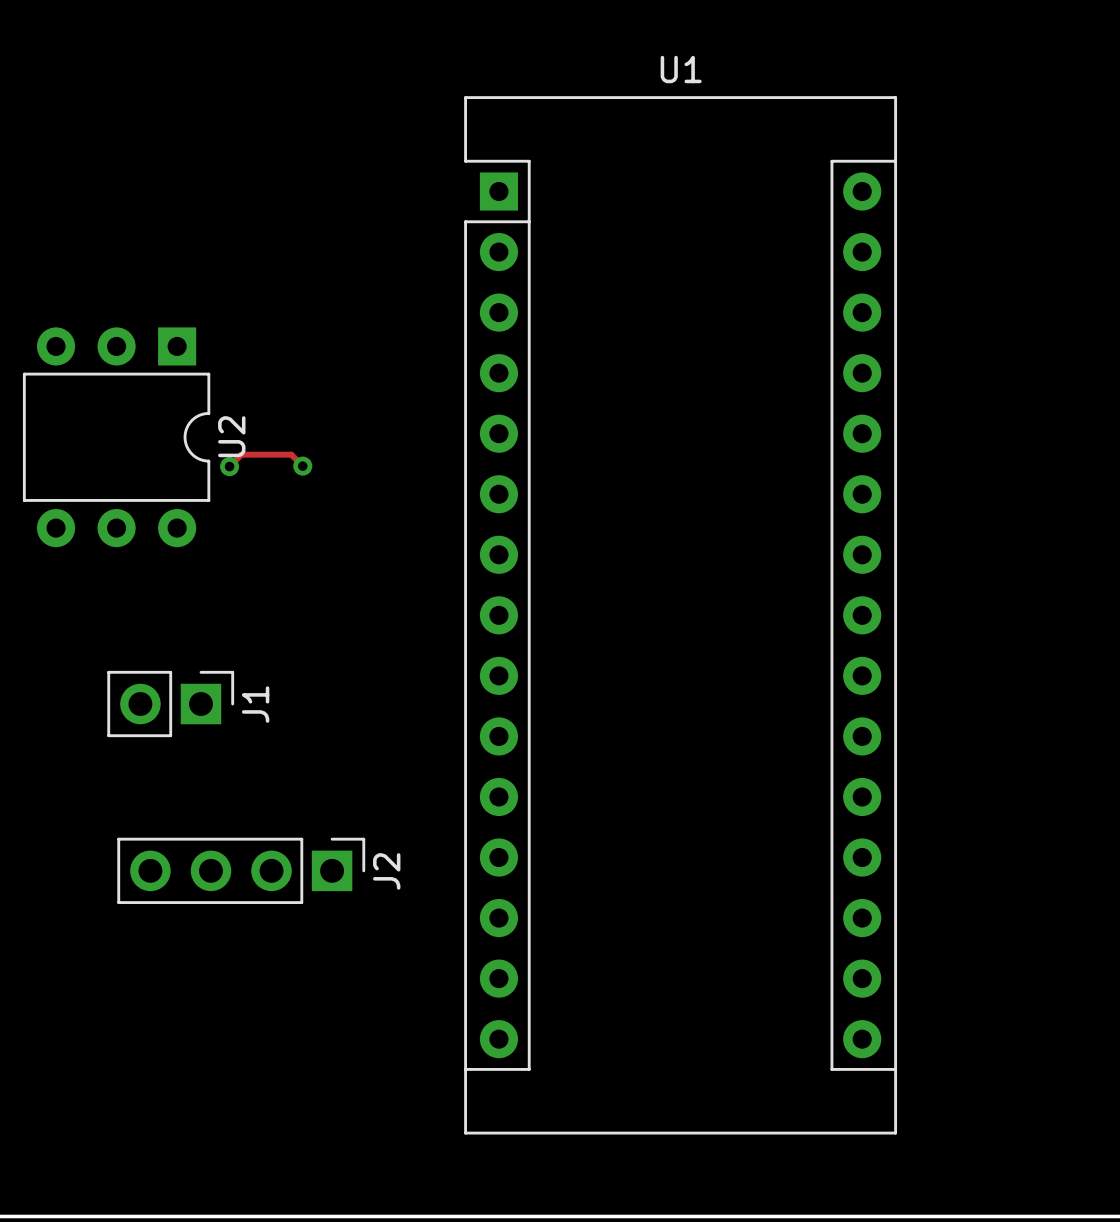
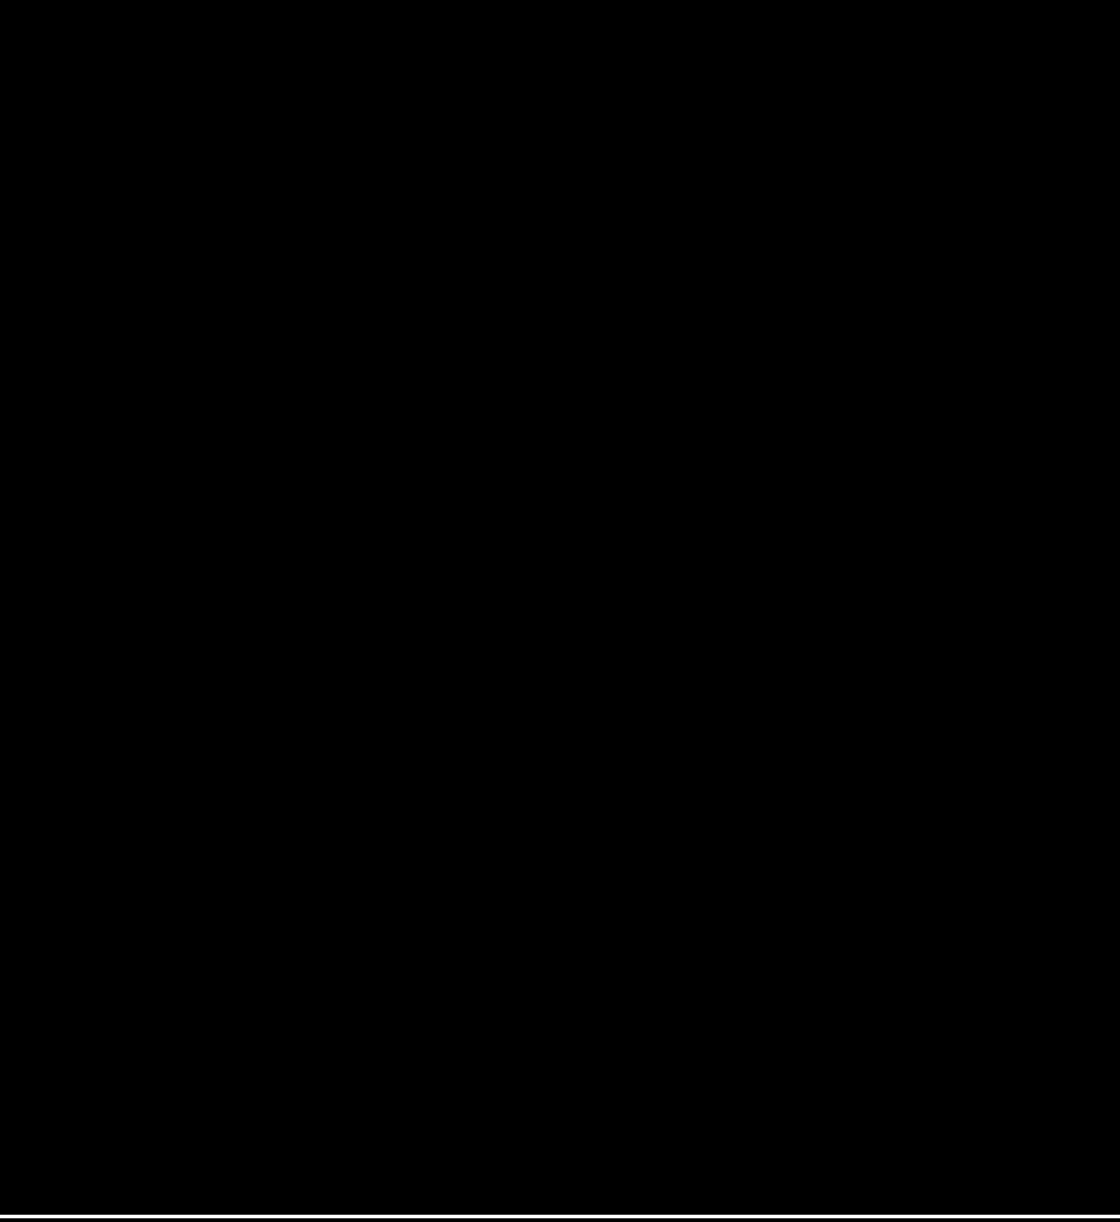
U2: (116, 437) -> none
via: (229, 466) -> none
track: (302, 466) (291, 454) (241, 454) (229, 466) -> none
via: (302, 466) -> none
U1: (680, 615) -> none
J1: (170, 704) -> none
J2: (241, 870) -> none

